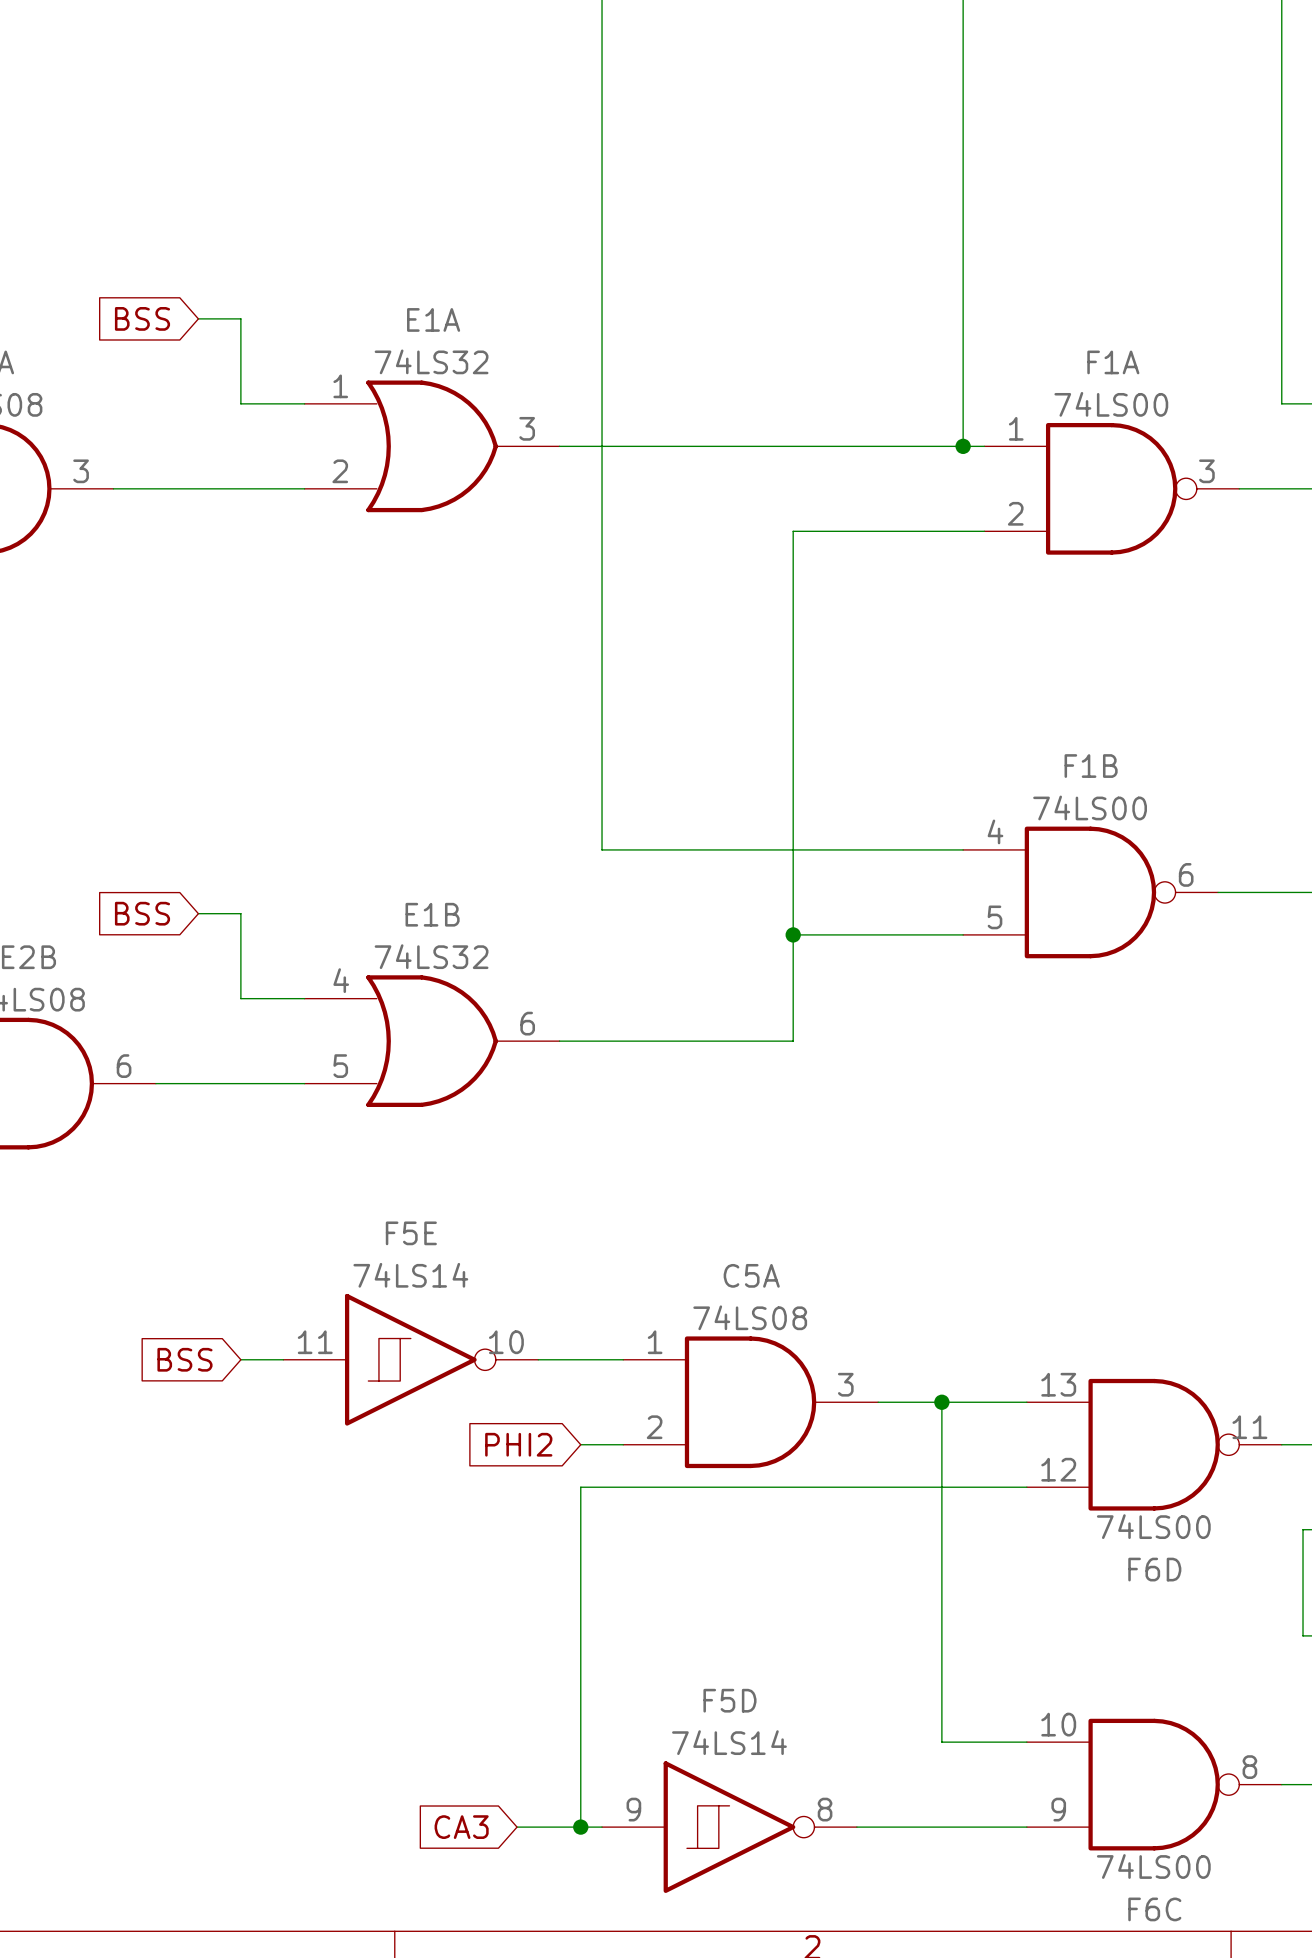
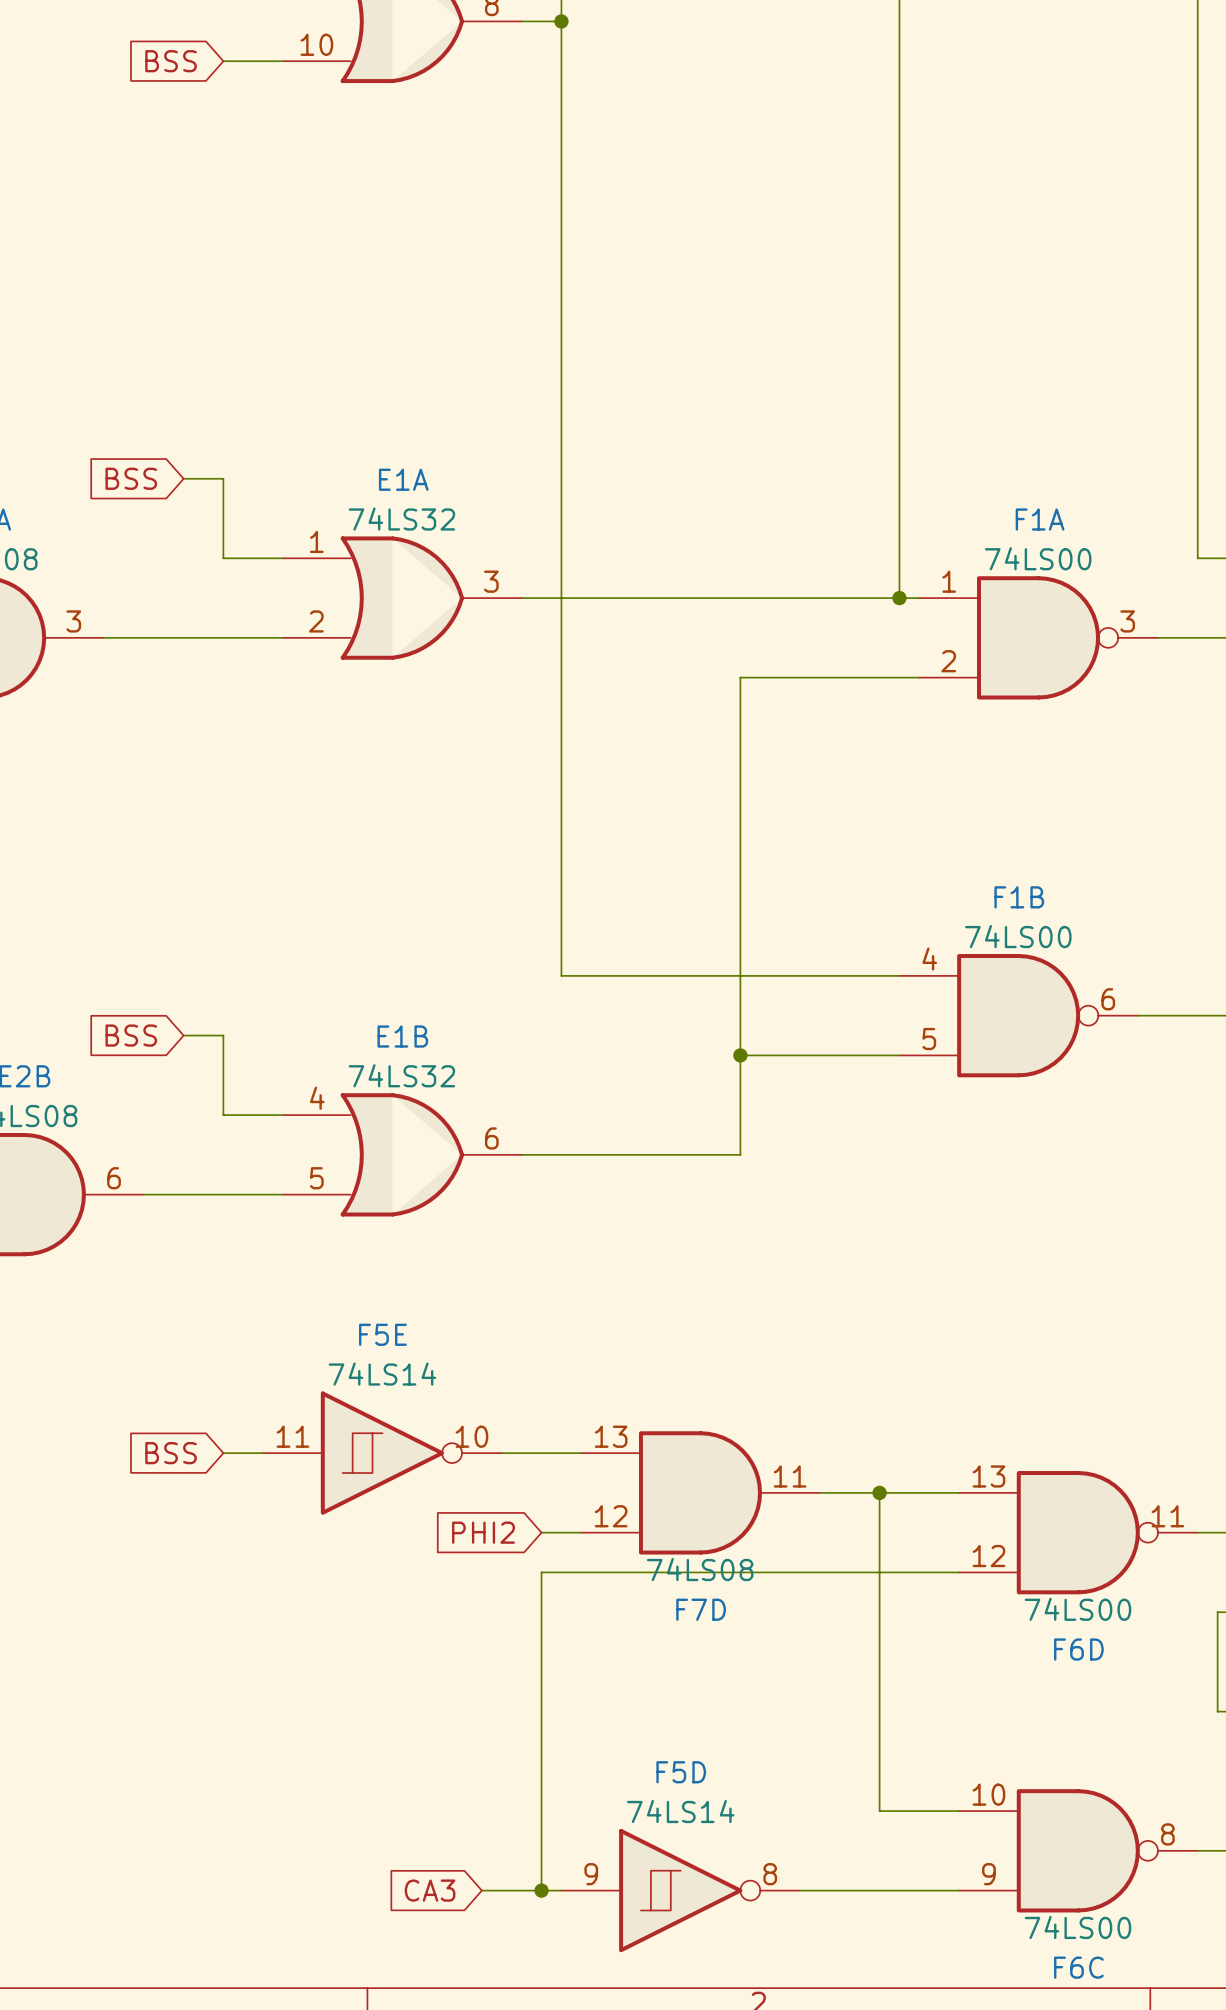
C5A name: C5A (751, 1275) -> F7D (701, 1609)
C5A value position: 74LS08 (750, 1317) -> 74LS08 (700, 1569)
C5A pin number: 1 (655, 1342) -> 13 (611, 1436)
C5A pin number: 3 (845, 1384) -> 11 (790, 1476)
C5A pin number: 2 (654, 1427) -> 12 (611, 1516)

